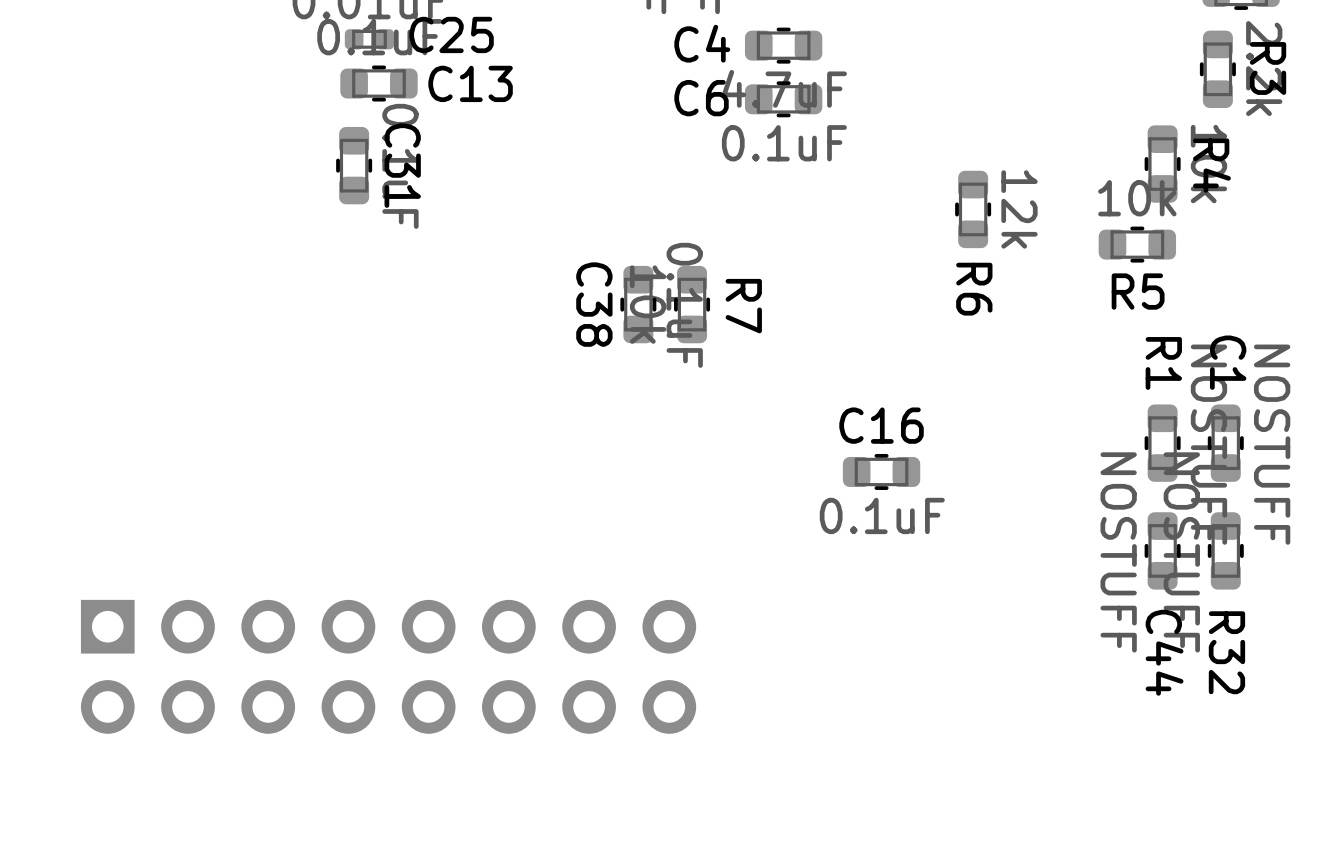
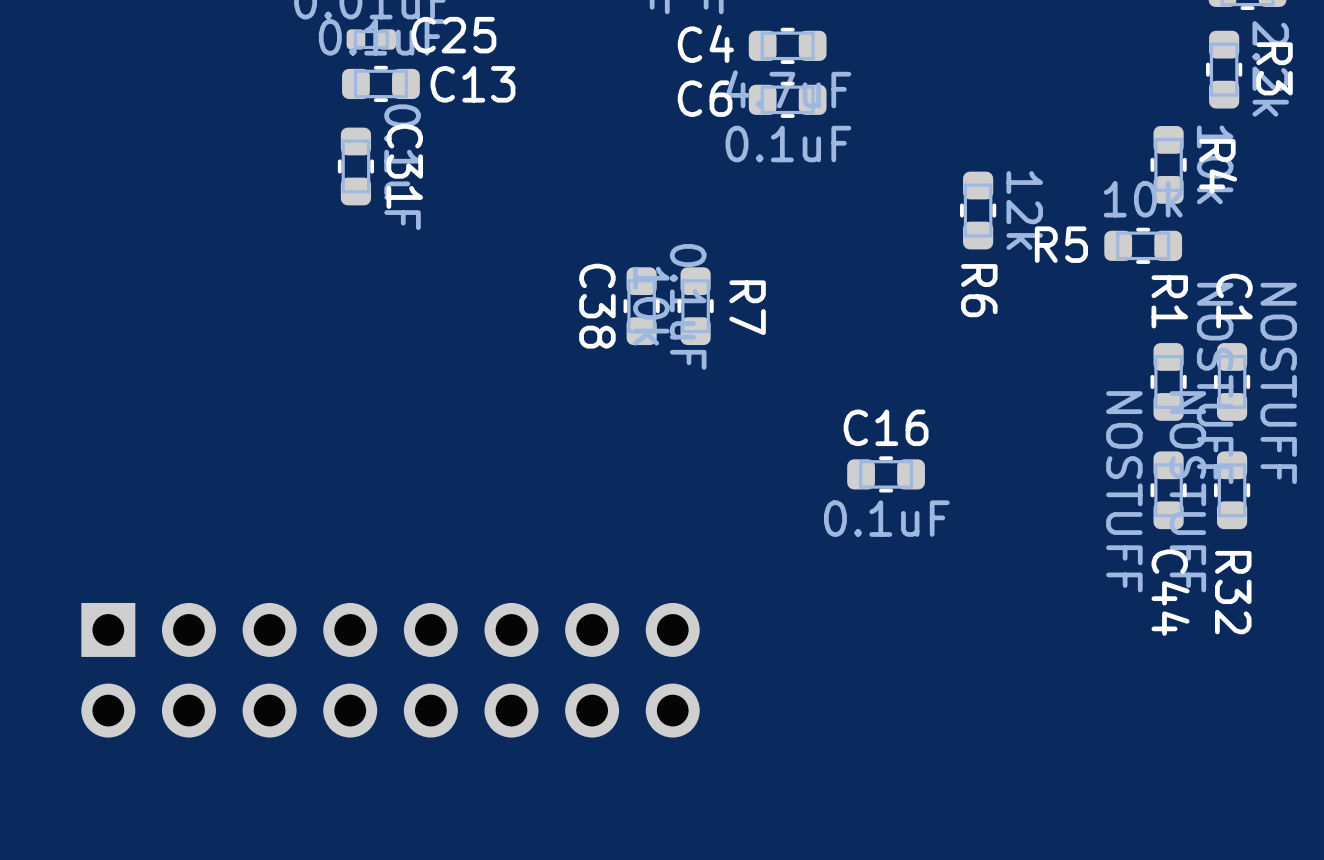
R5 name position: R5 (1138, 291) -> R5 (1061, 244)
R1 position: (1162, 443) -> (1168, 381)
C1 position: (1225, 443) -> (1232, 381)
C44 position: (1162, 550) -> (1168, 490)
R32 position: (1225, 550) -> (1232, 490)

